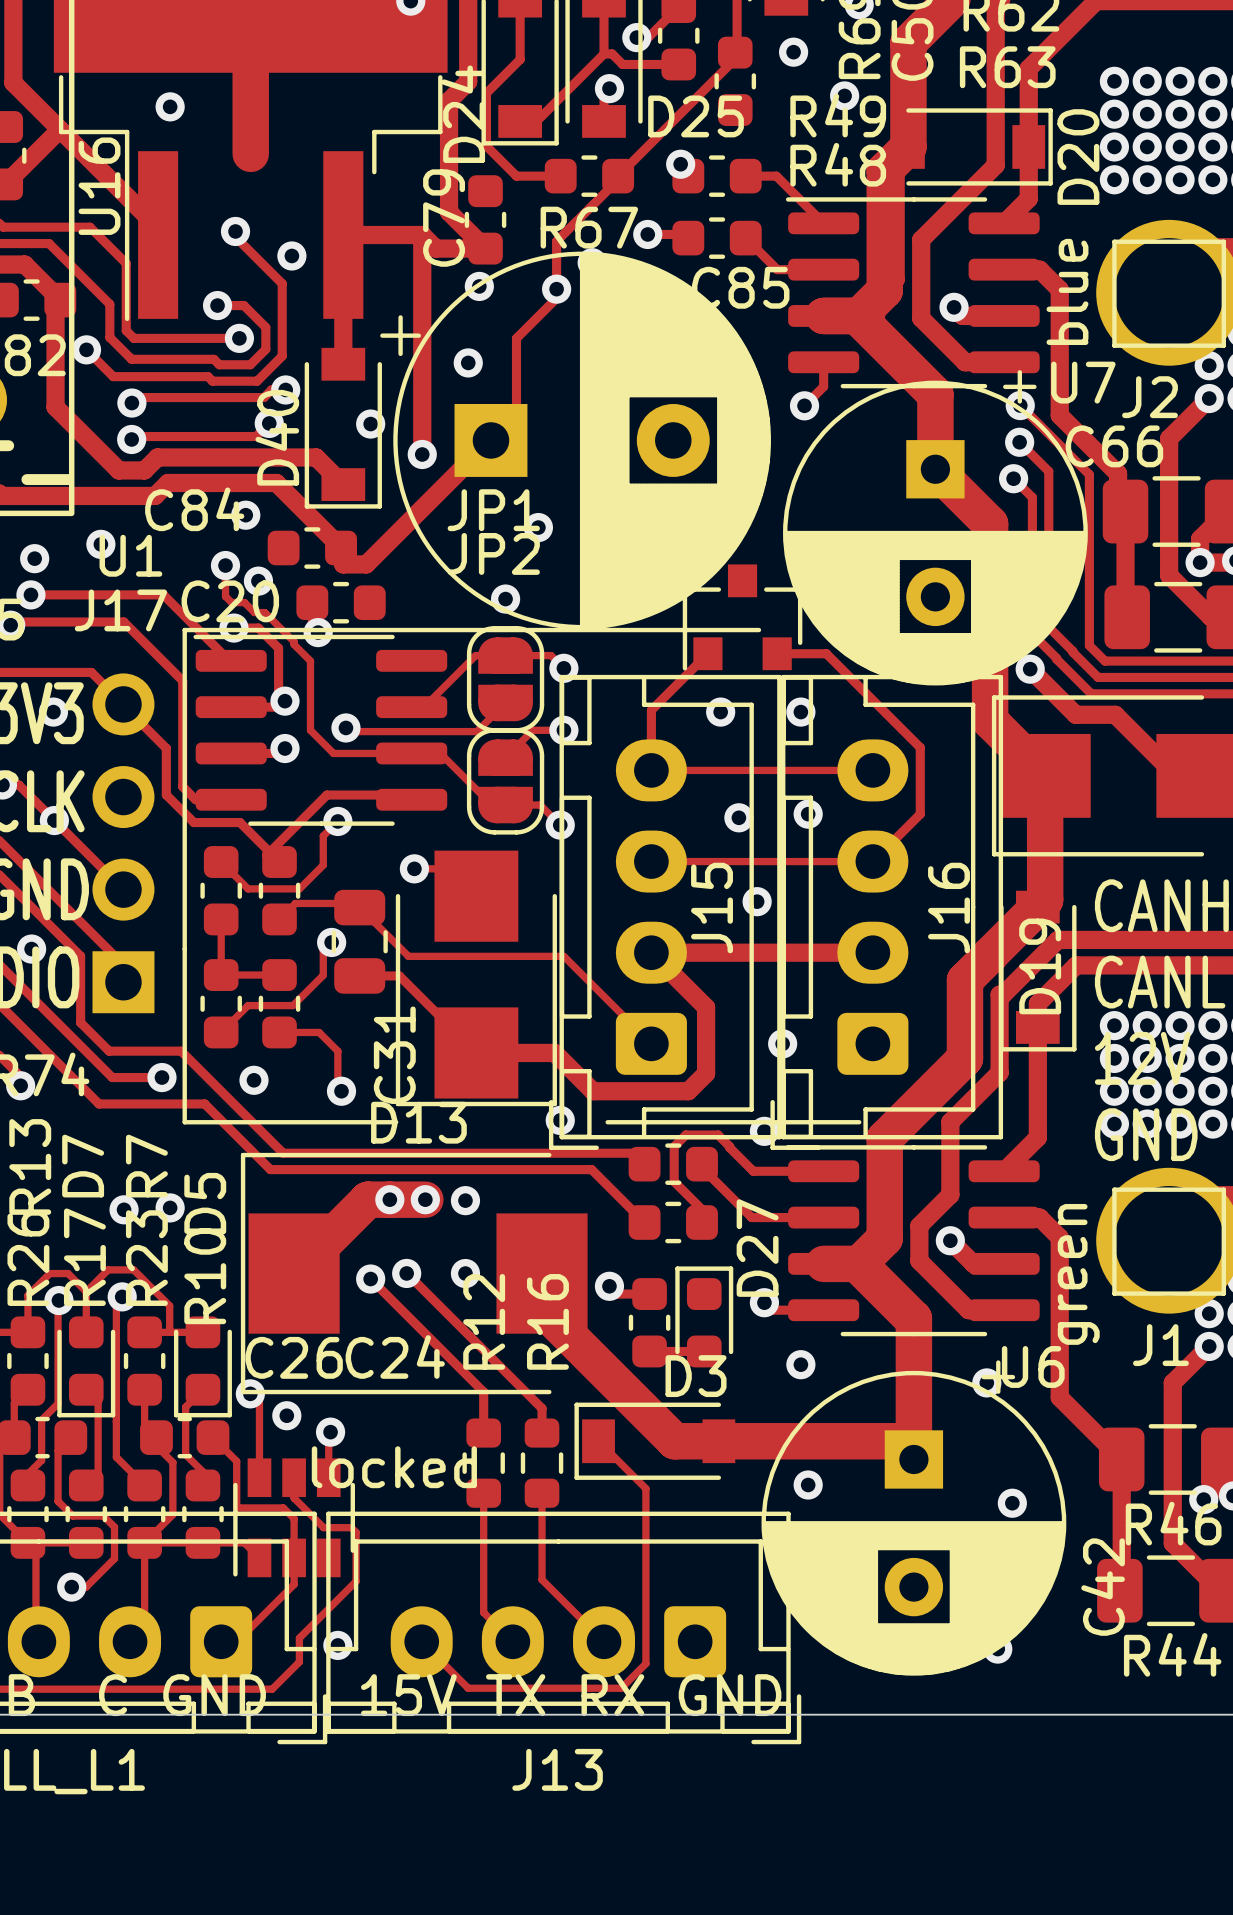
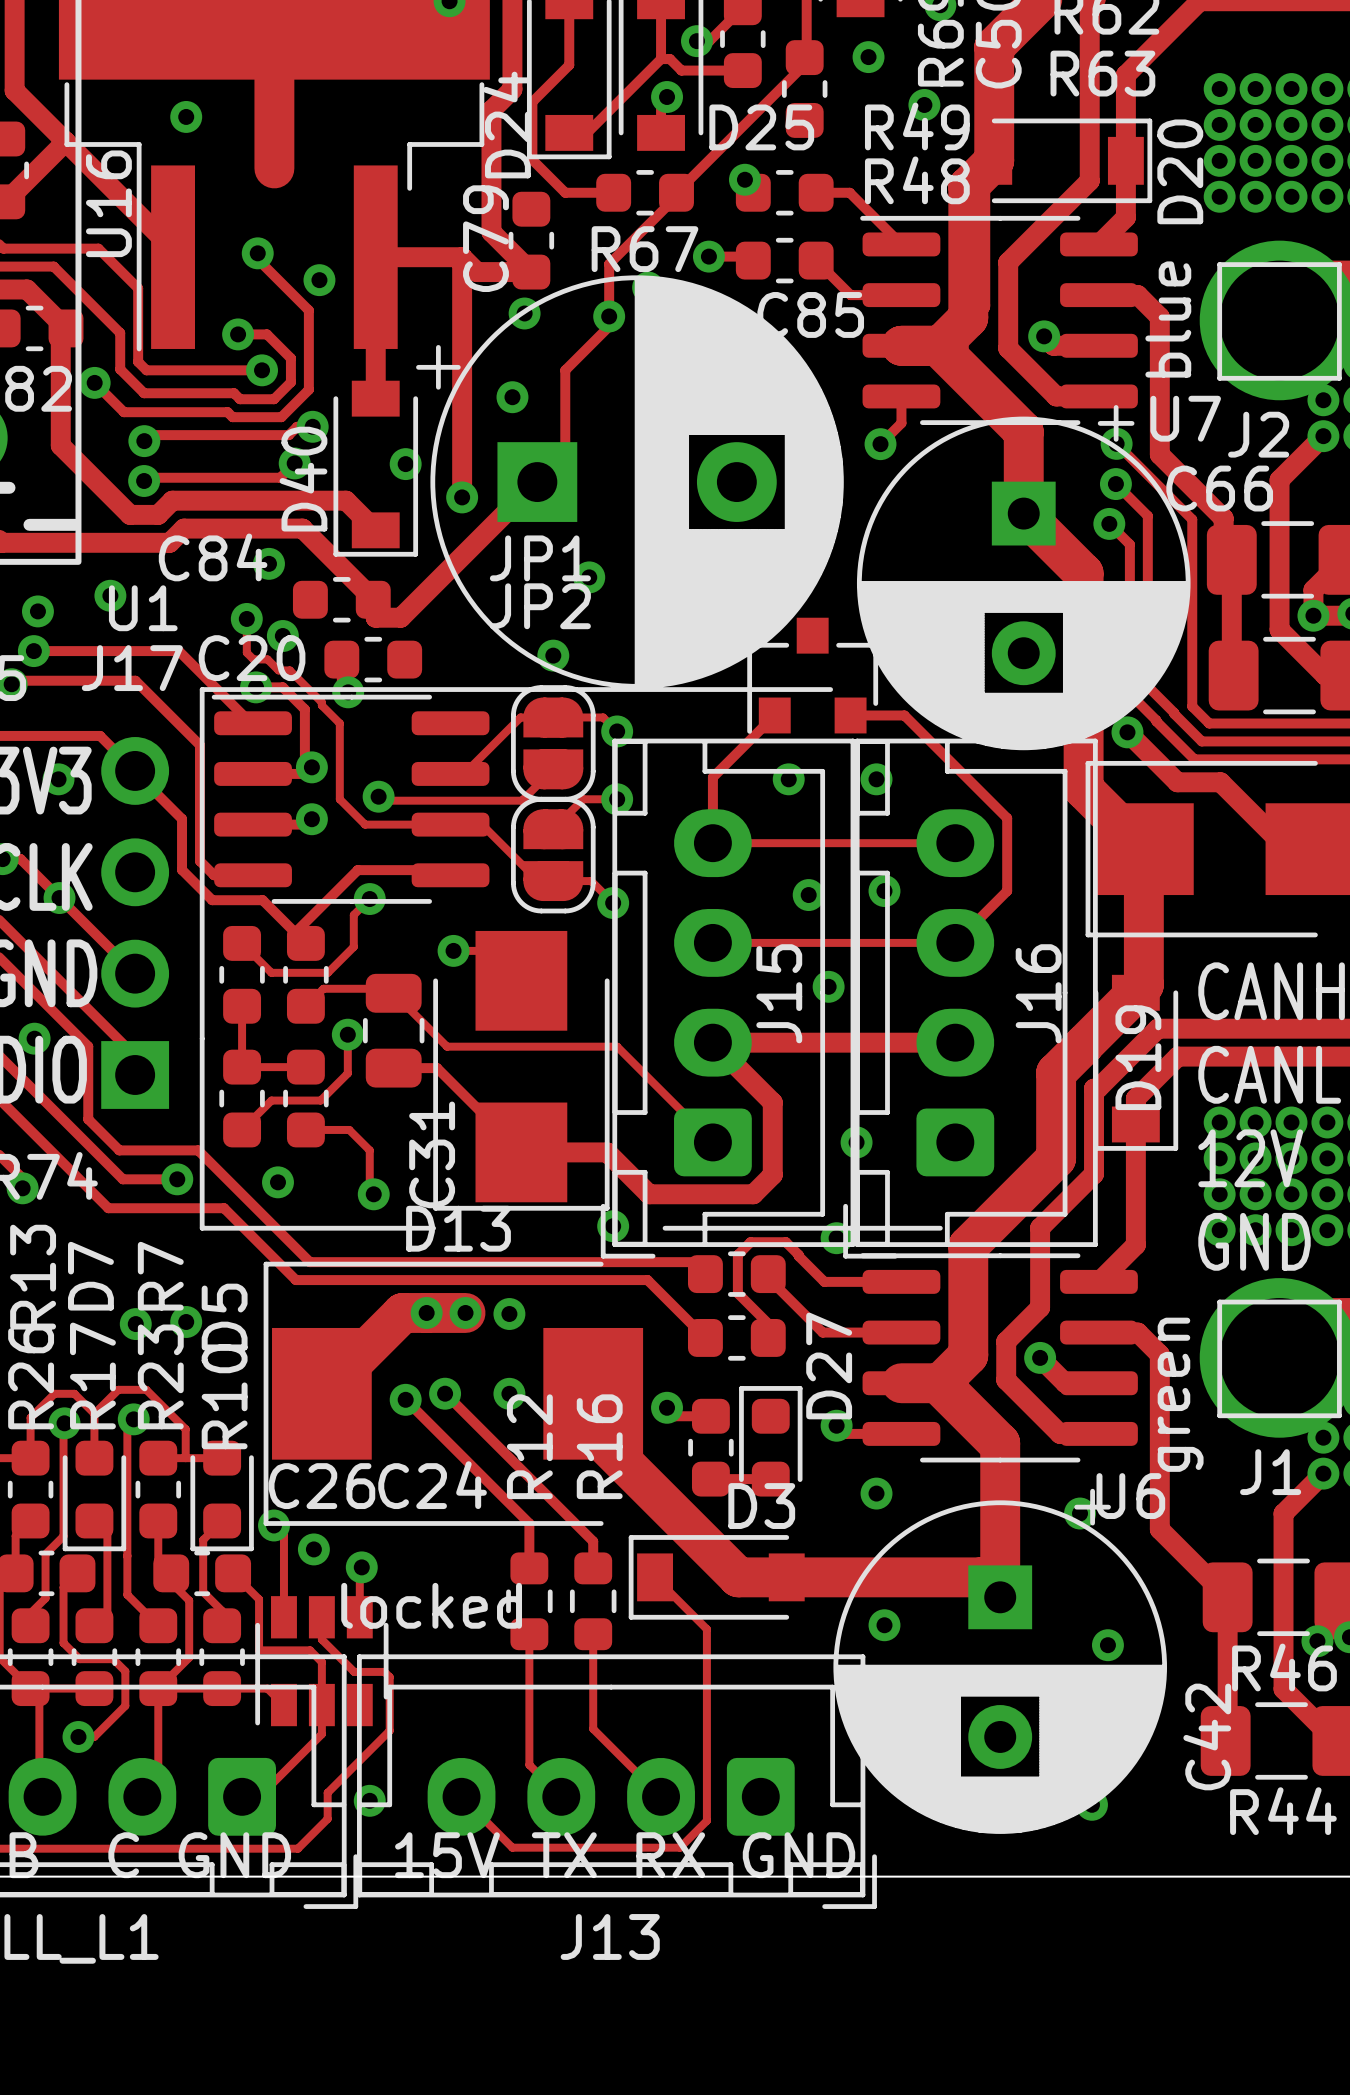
track: (331, 942) (323, 950) (323, 975) (317, 980) -> (347, 1034) (347, 1073)
via position: (331, 942) -> (347, 1034)

